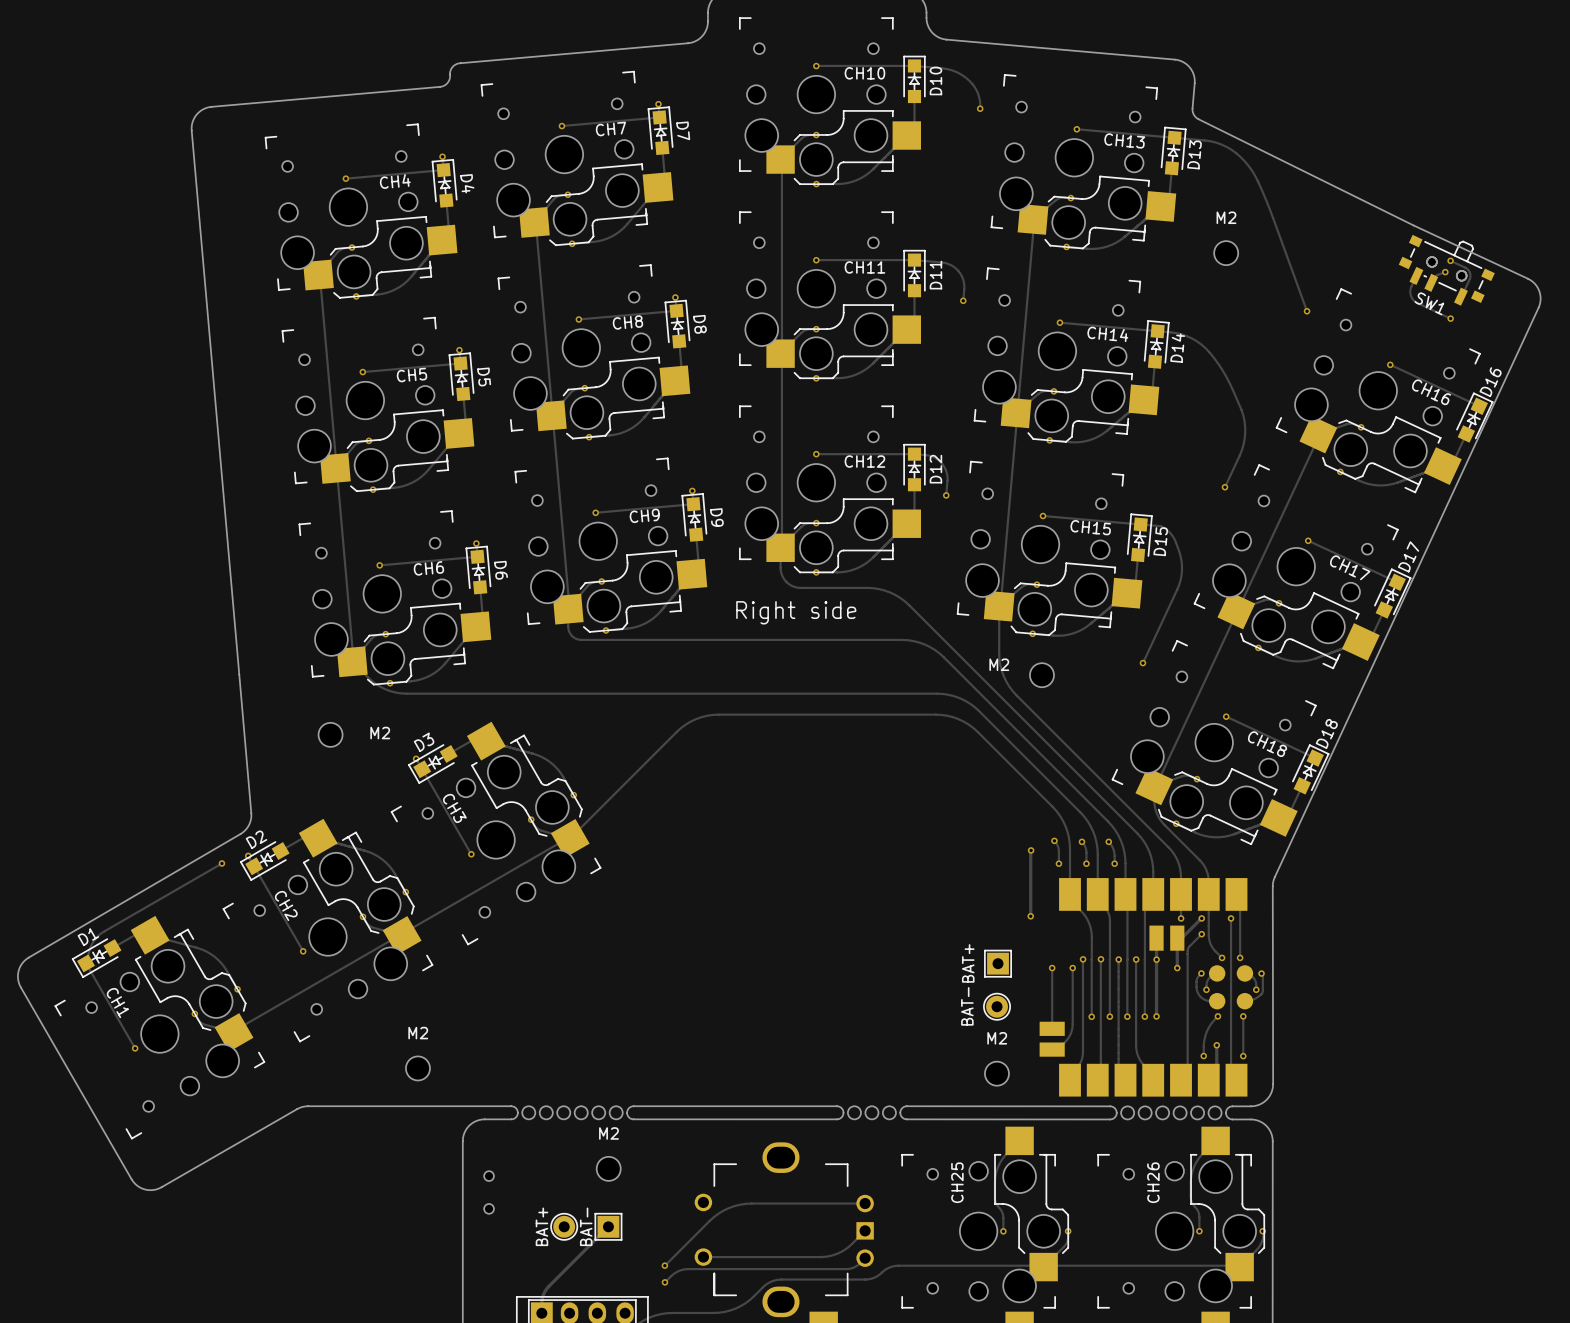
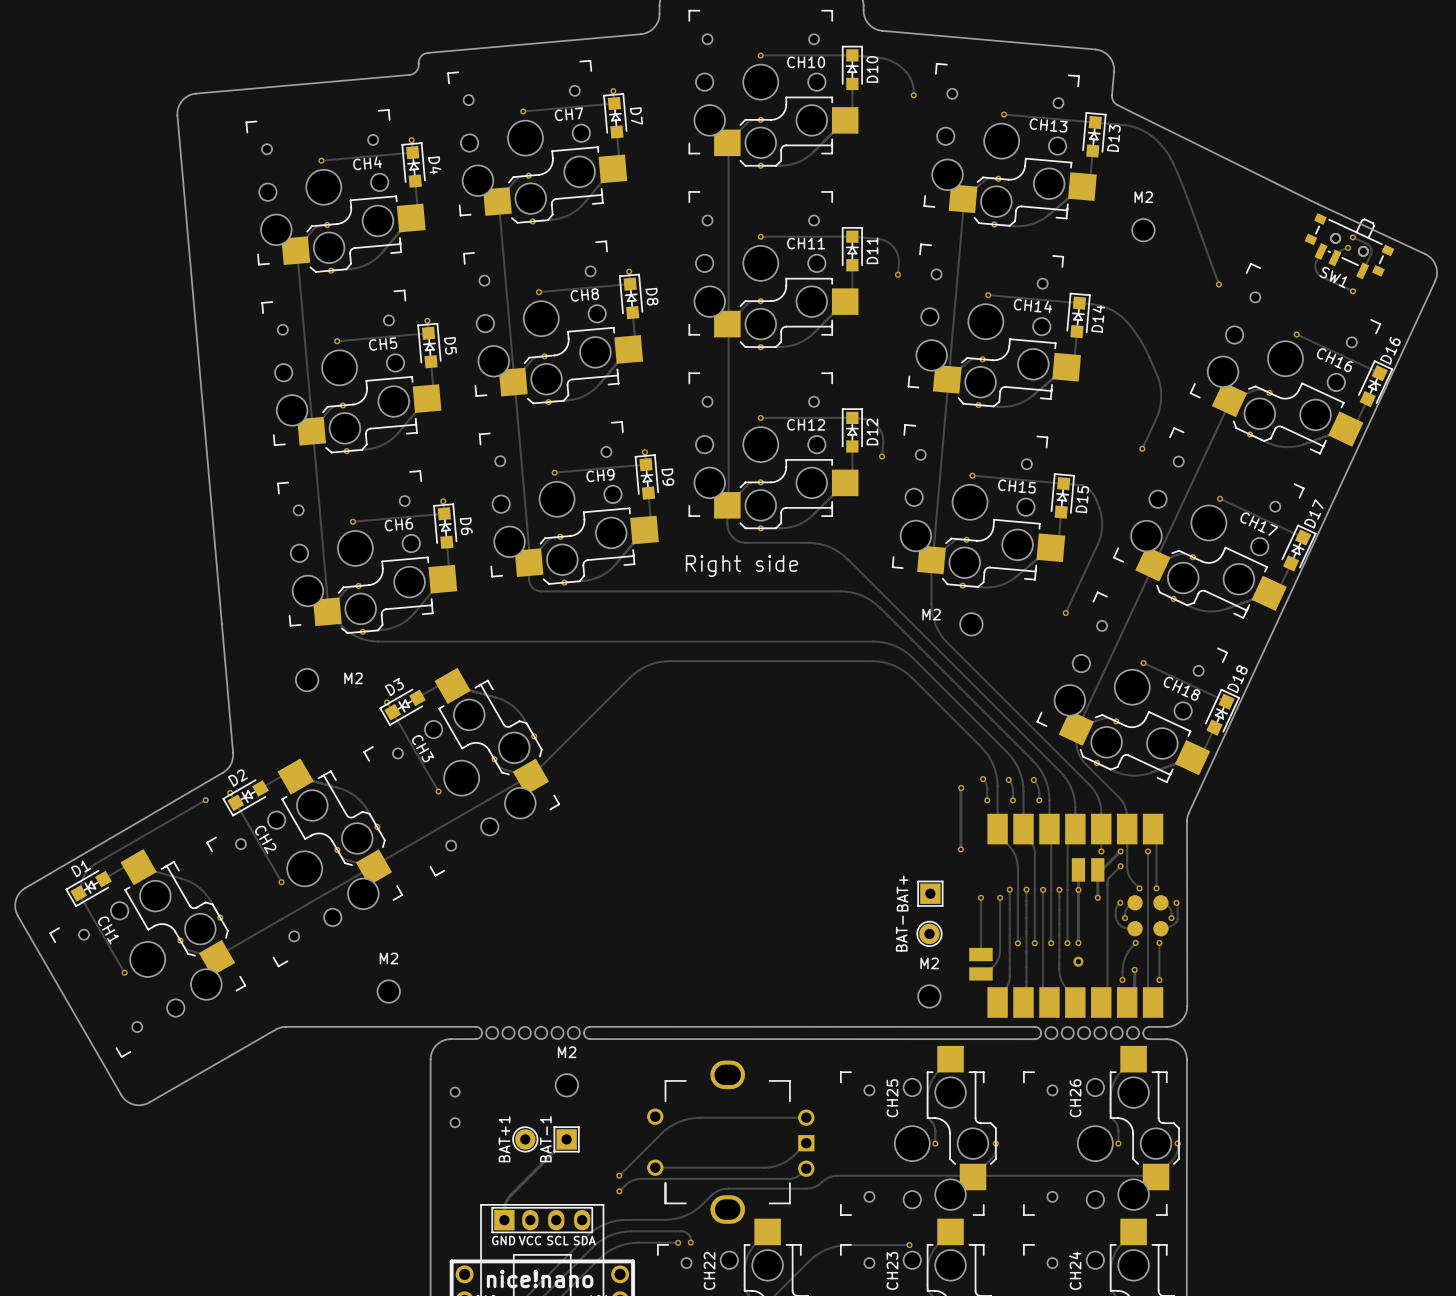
via: none -> (1078, 961)
round board edge: [847, 1105, 862, 1120] -> none
round board edge: [865, 1105, 879, 1120] -> none
round board edge: [882, 1105, 897, 1120] -> none
board edge: (633, 1106) (836, 1106) (841, 1108) (843, 1112) (841, 1117) (836, 1119) (633, 1119) -> (590, 1026) (1035, 1026)
board edge: (1110, 1106) (906, 1106) (902, 1108) (900, 1112) (902, 1117) (906, 1119) (1110, 1119) -> (590, 1039) (1035, 1039)
BAT+ name: BAT+ (541, 1226) -> BAT+1 (504, 1139)
BAT- name: BAT- (586, 1226) -> BAT-1 (545, 1139)

